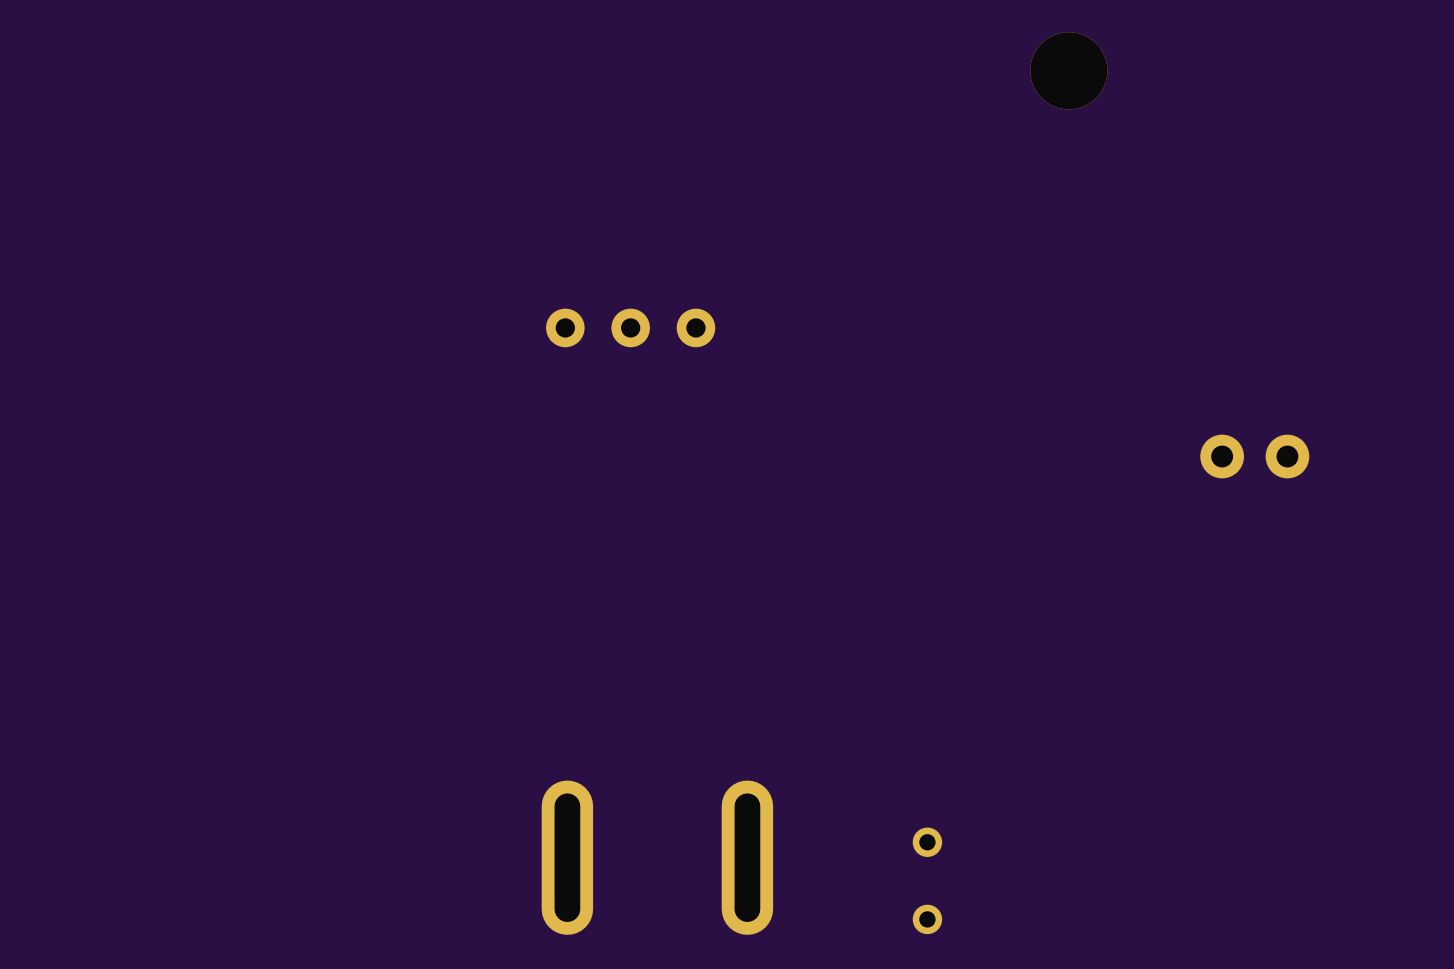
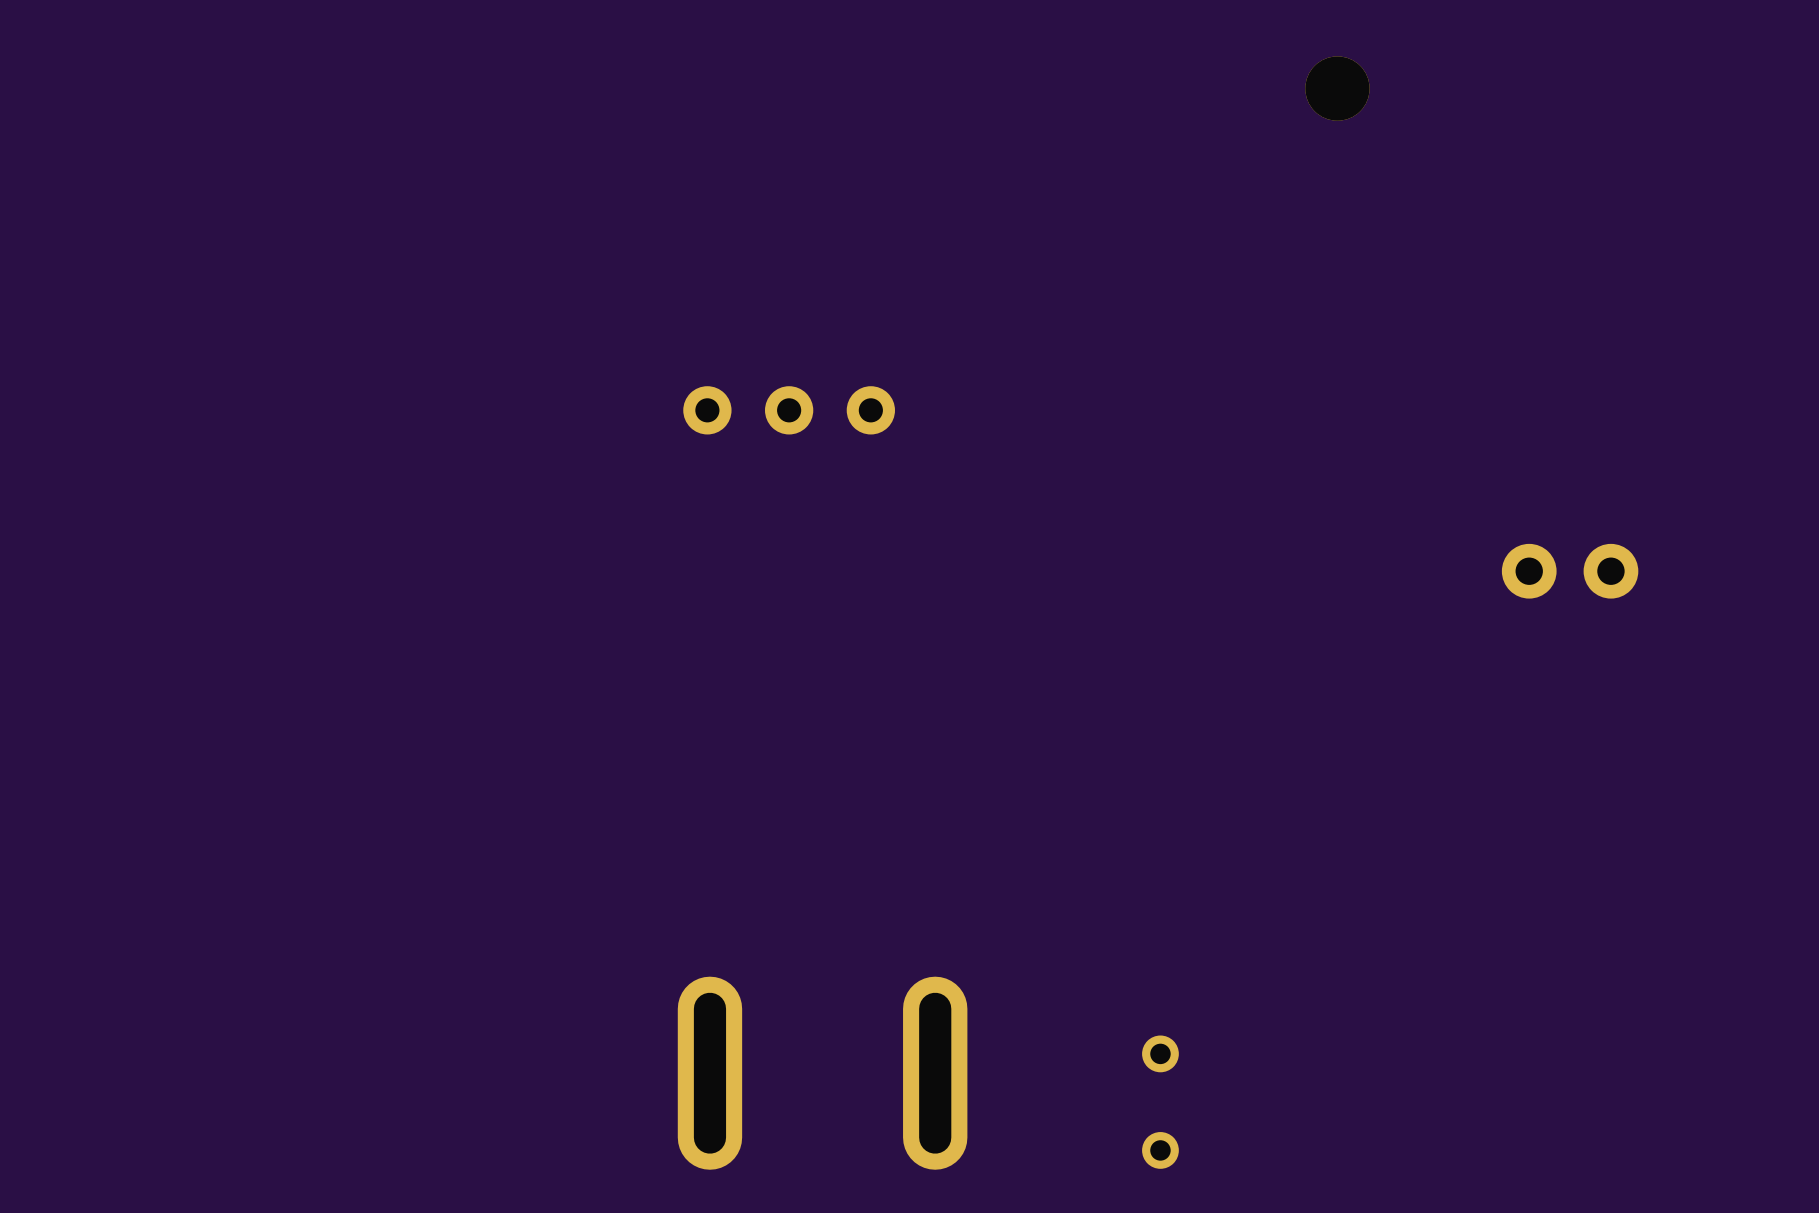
part footprint: [1030, 32, 1108, 110] -> [1305, 56, 1370, 121]

